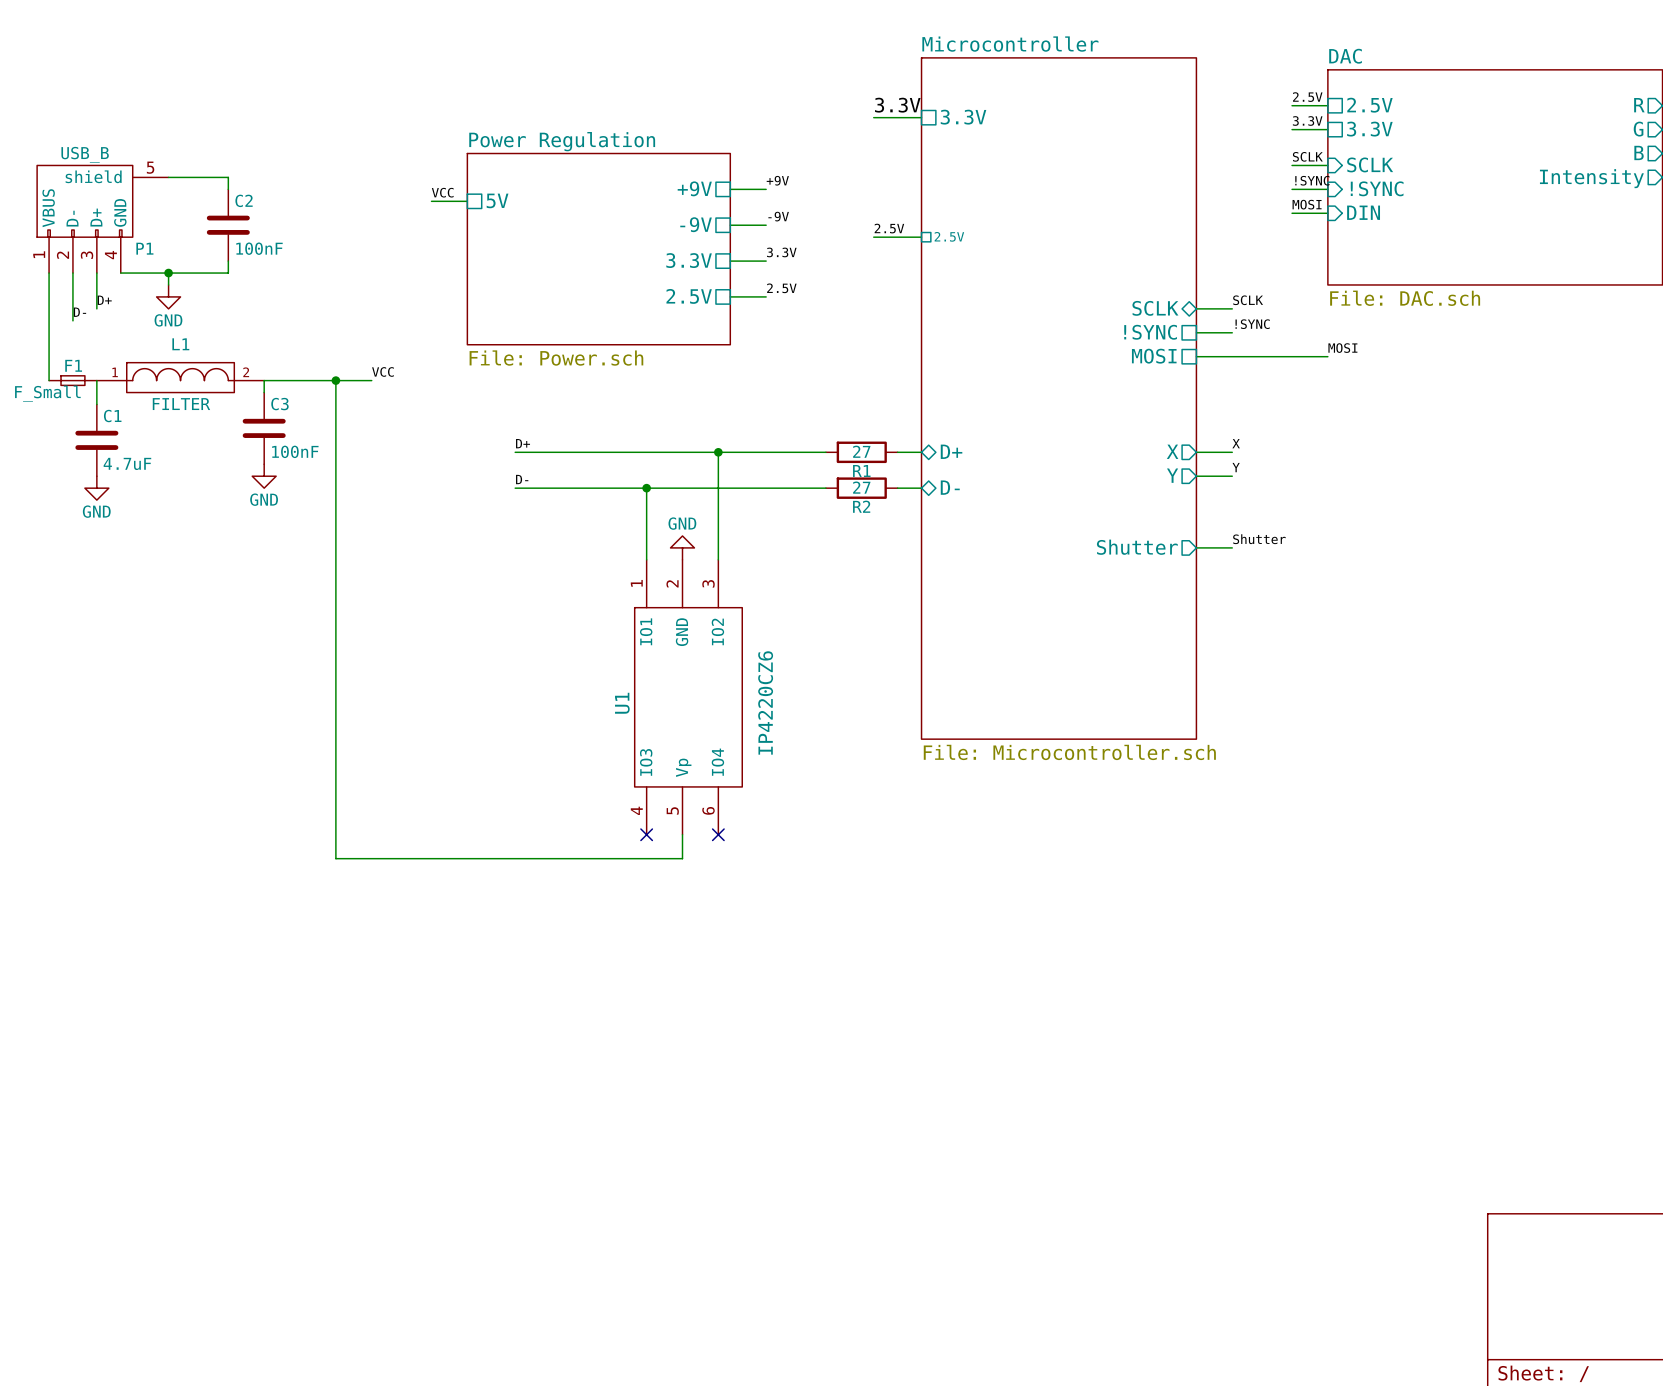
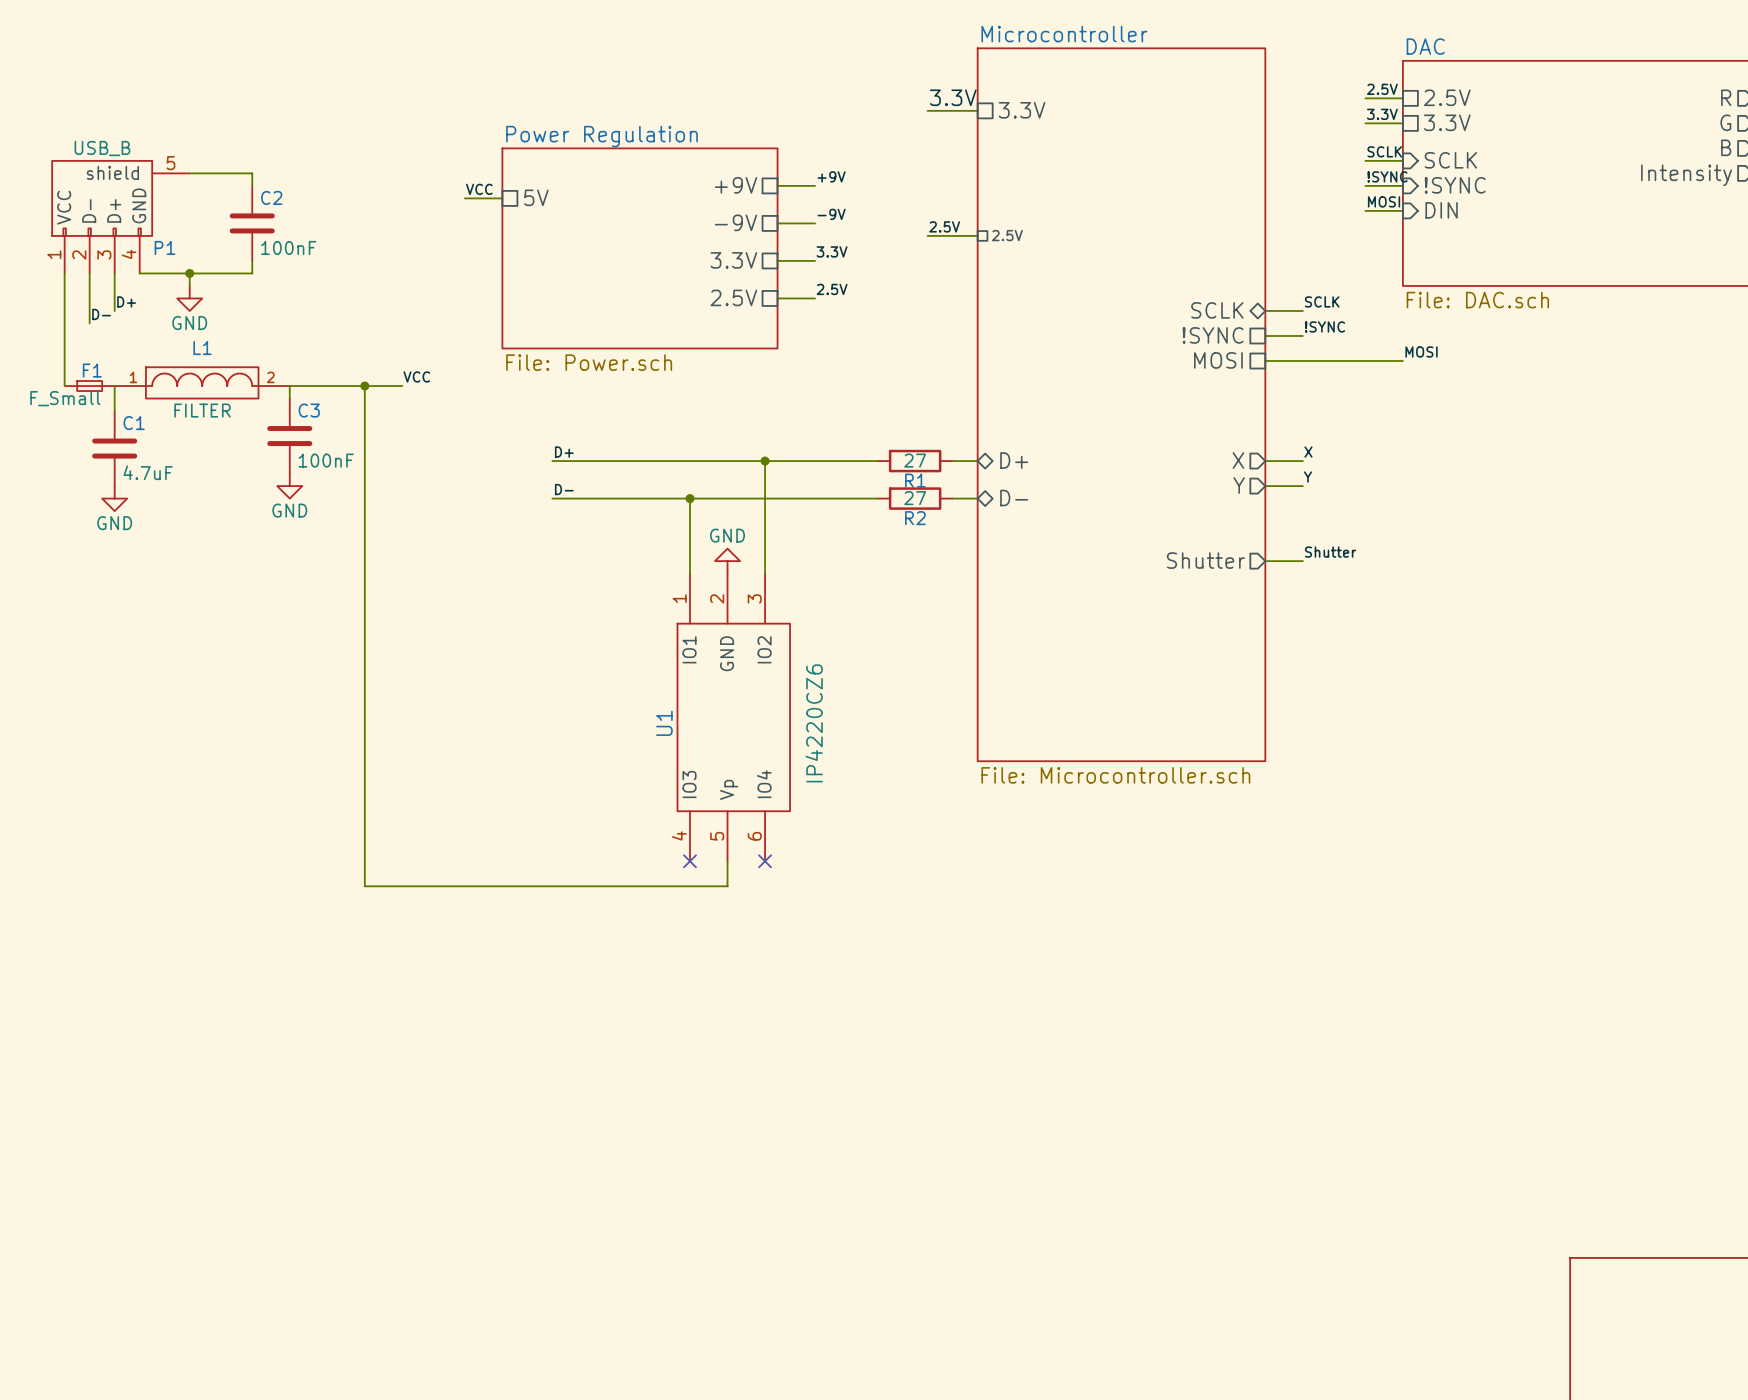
P1 pin name: VBUS (48, 208) -> VCC (64, 207)

